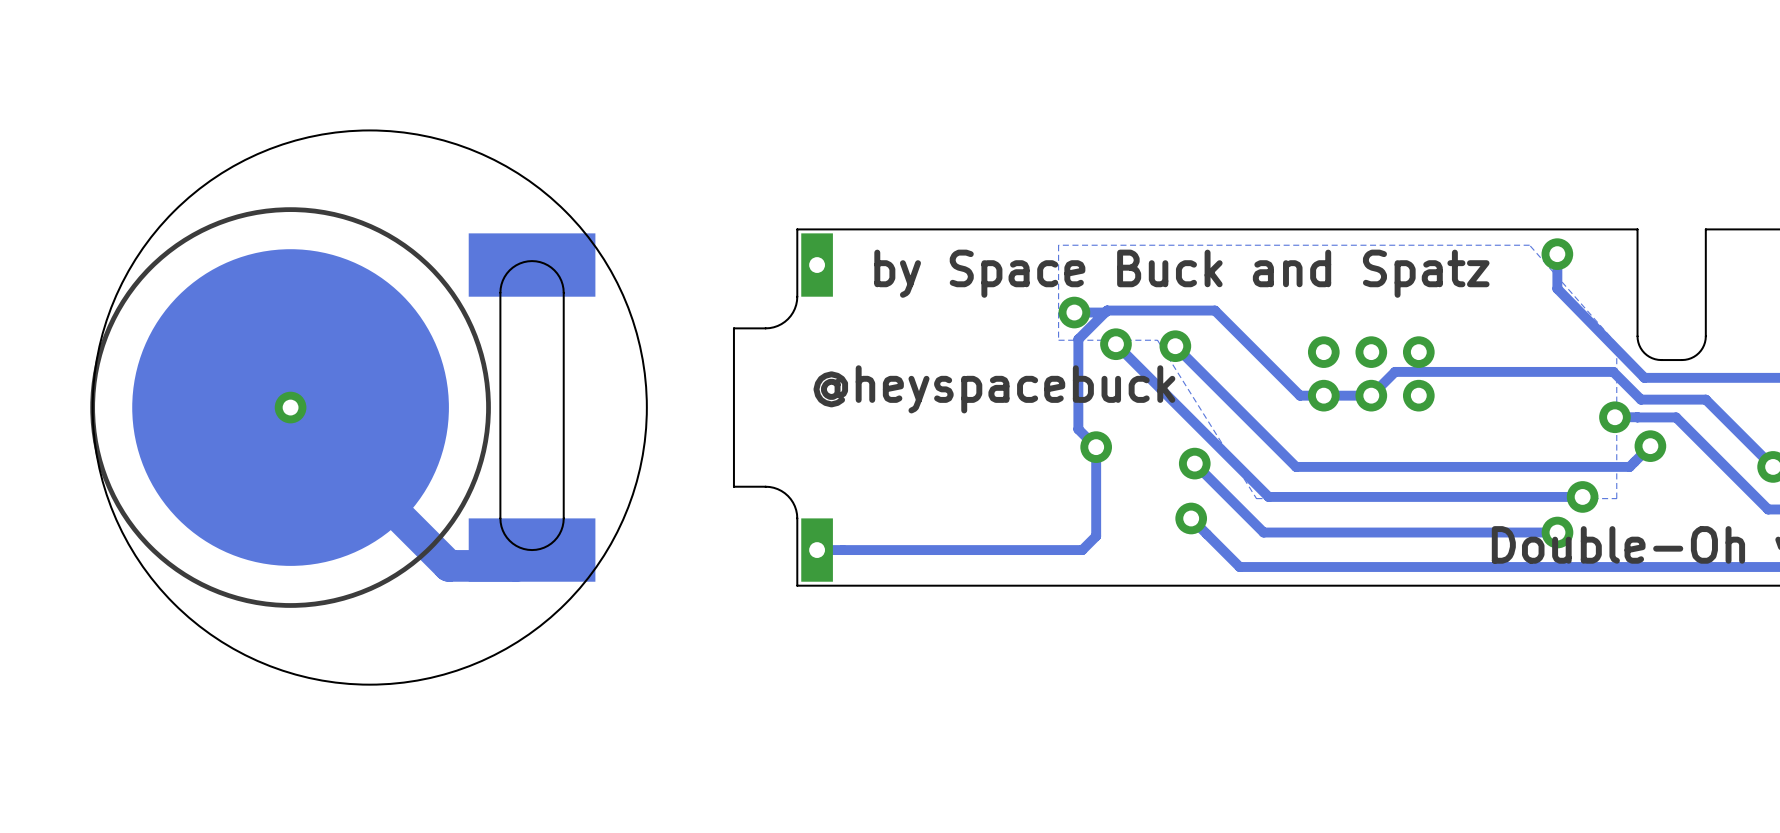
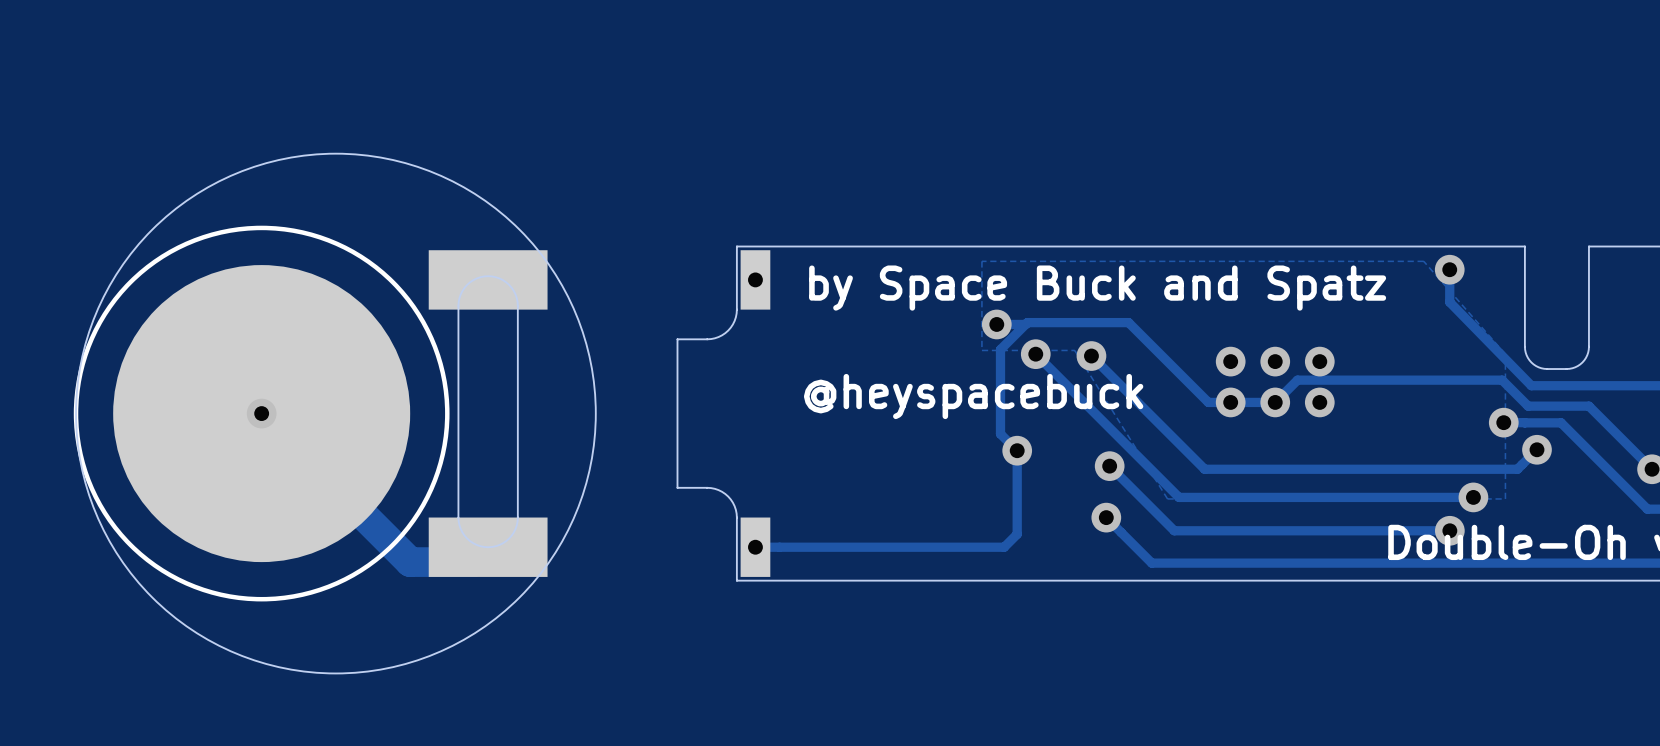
text position: @heyspacebuck (994, 389) -> @heyspacebuck (973, 396)

